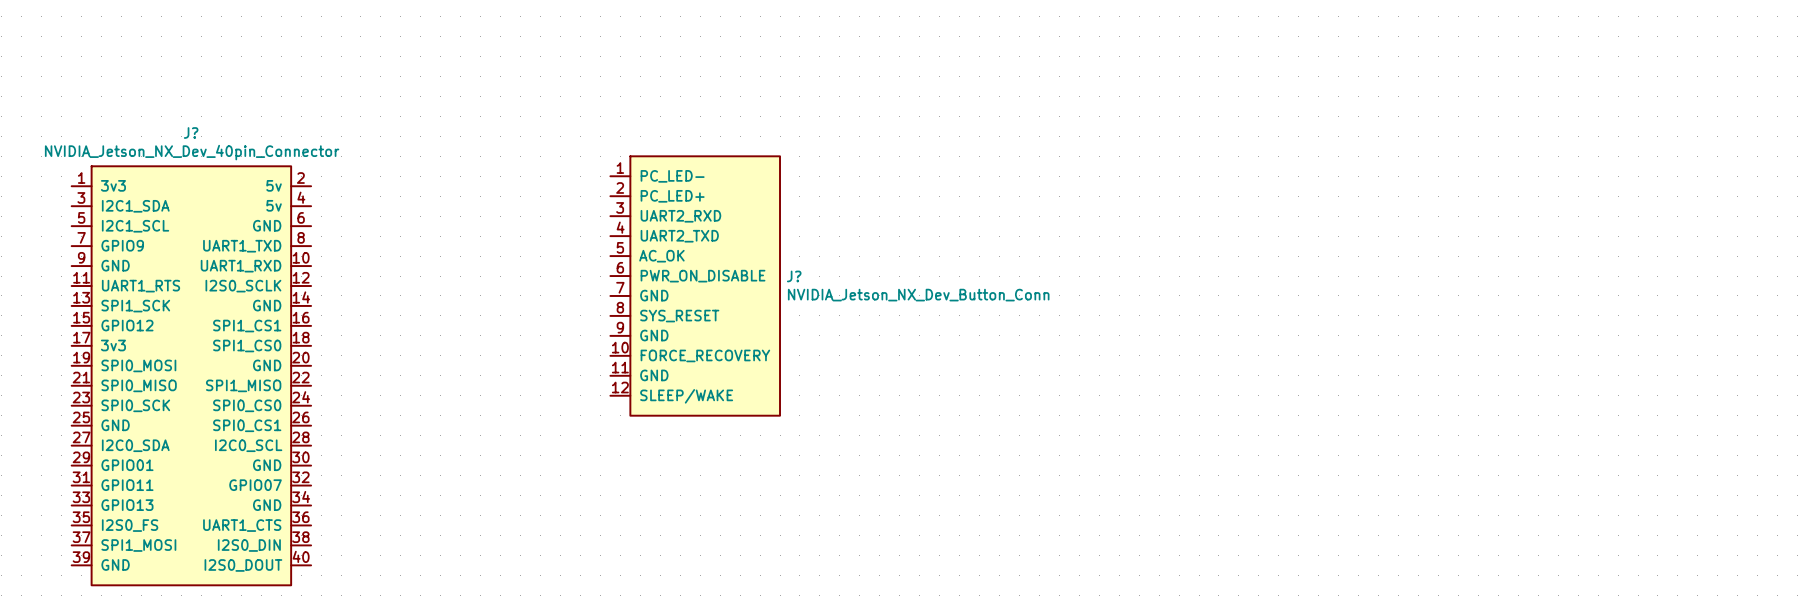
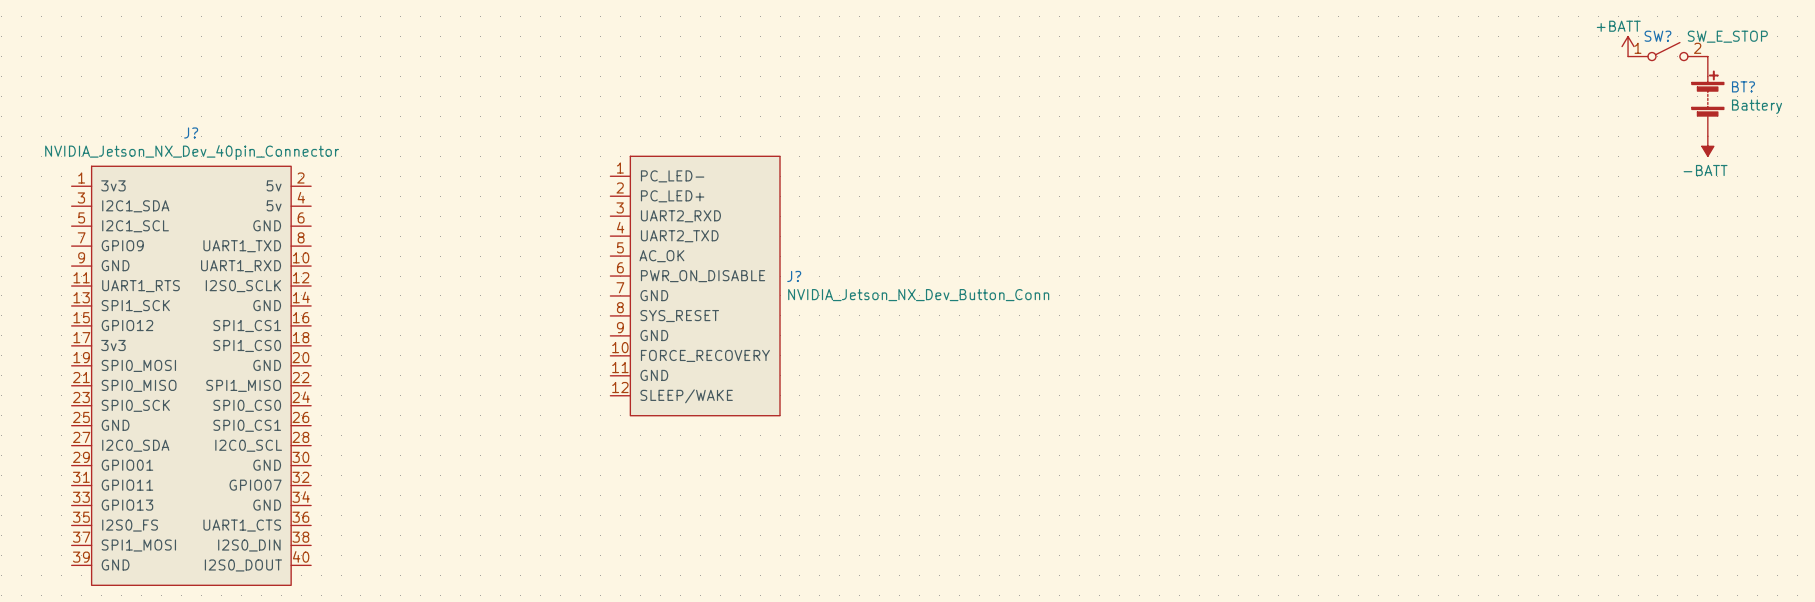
power symbol: none -> +BATT (1628, 46)
SW?: none -> SW_E_STOP (1667, 51)
BT?: none -> Battery (1707, 96)
power symbol: none -> -BATT (1707, 146)

